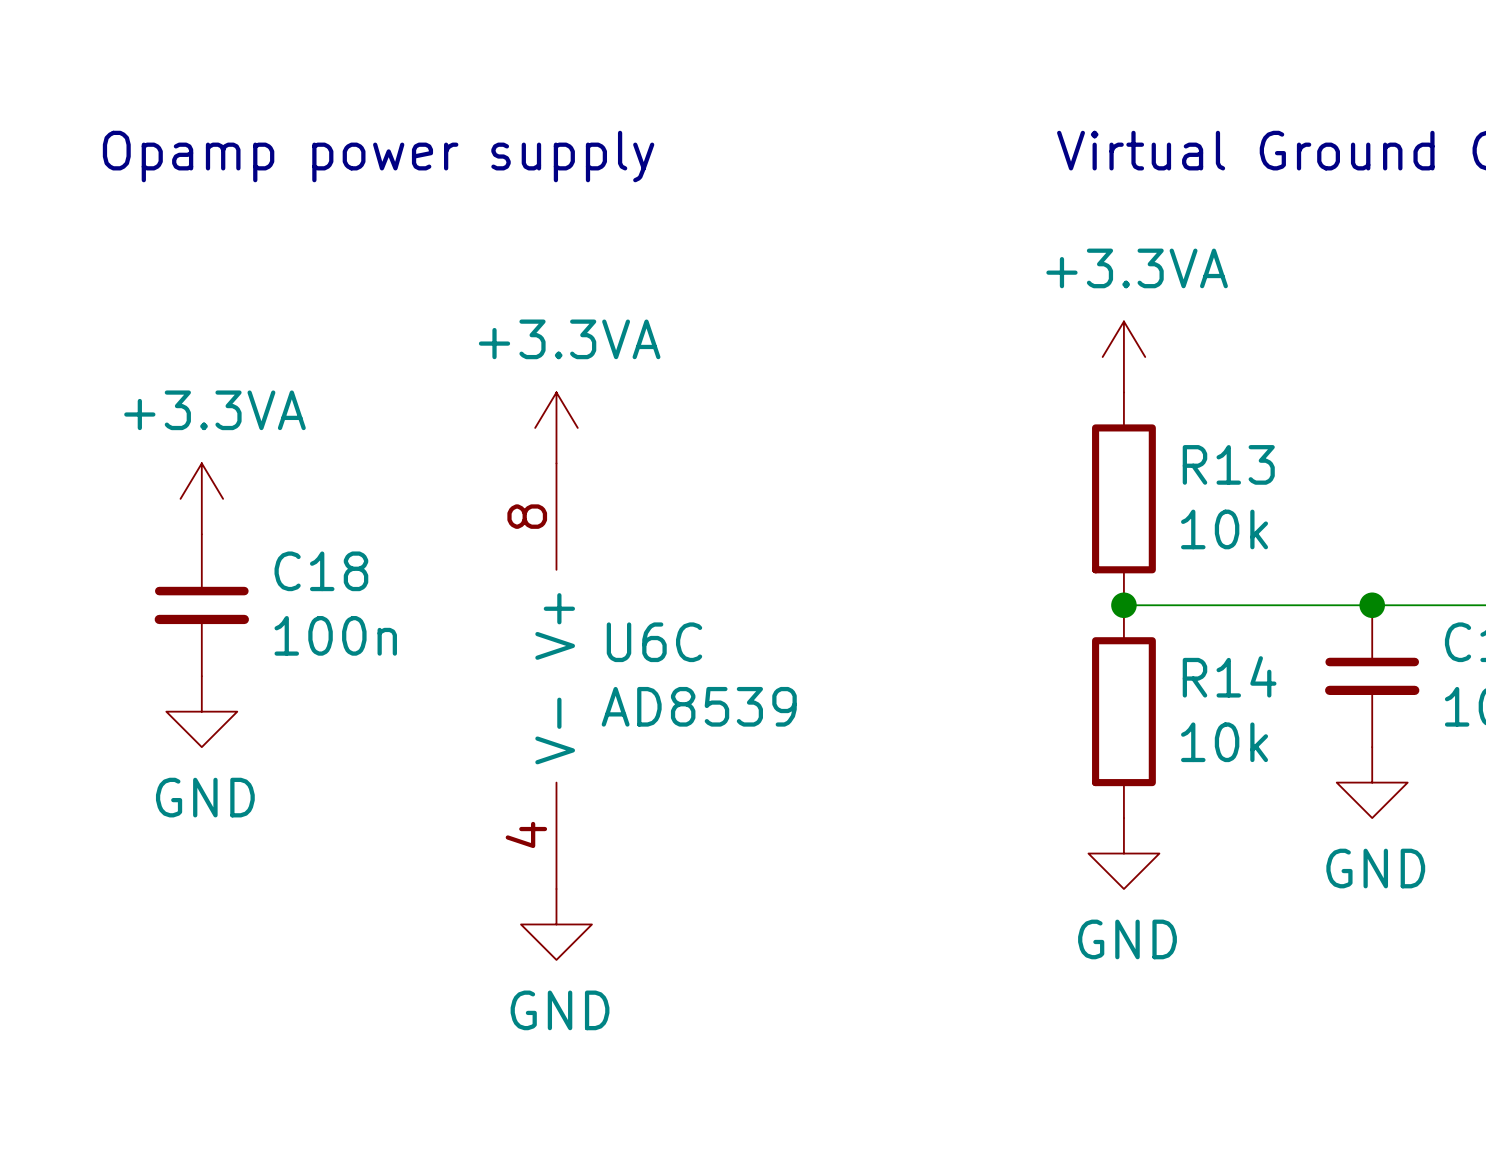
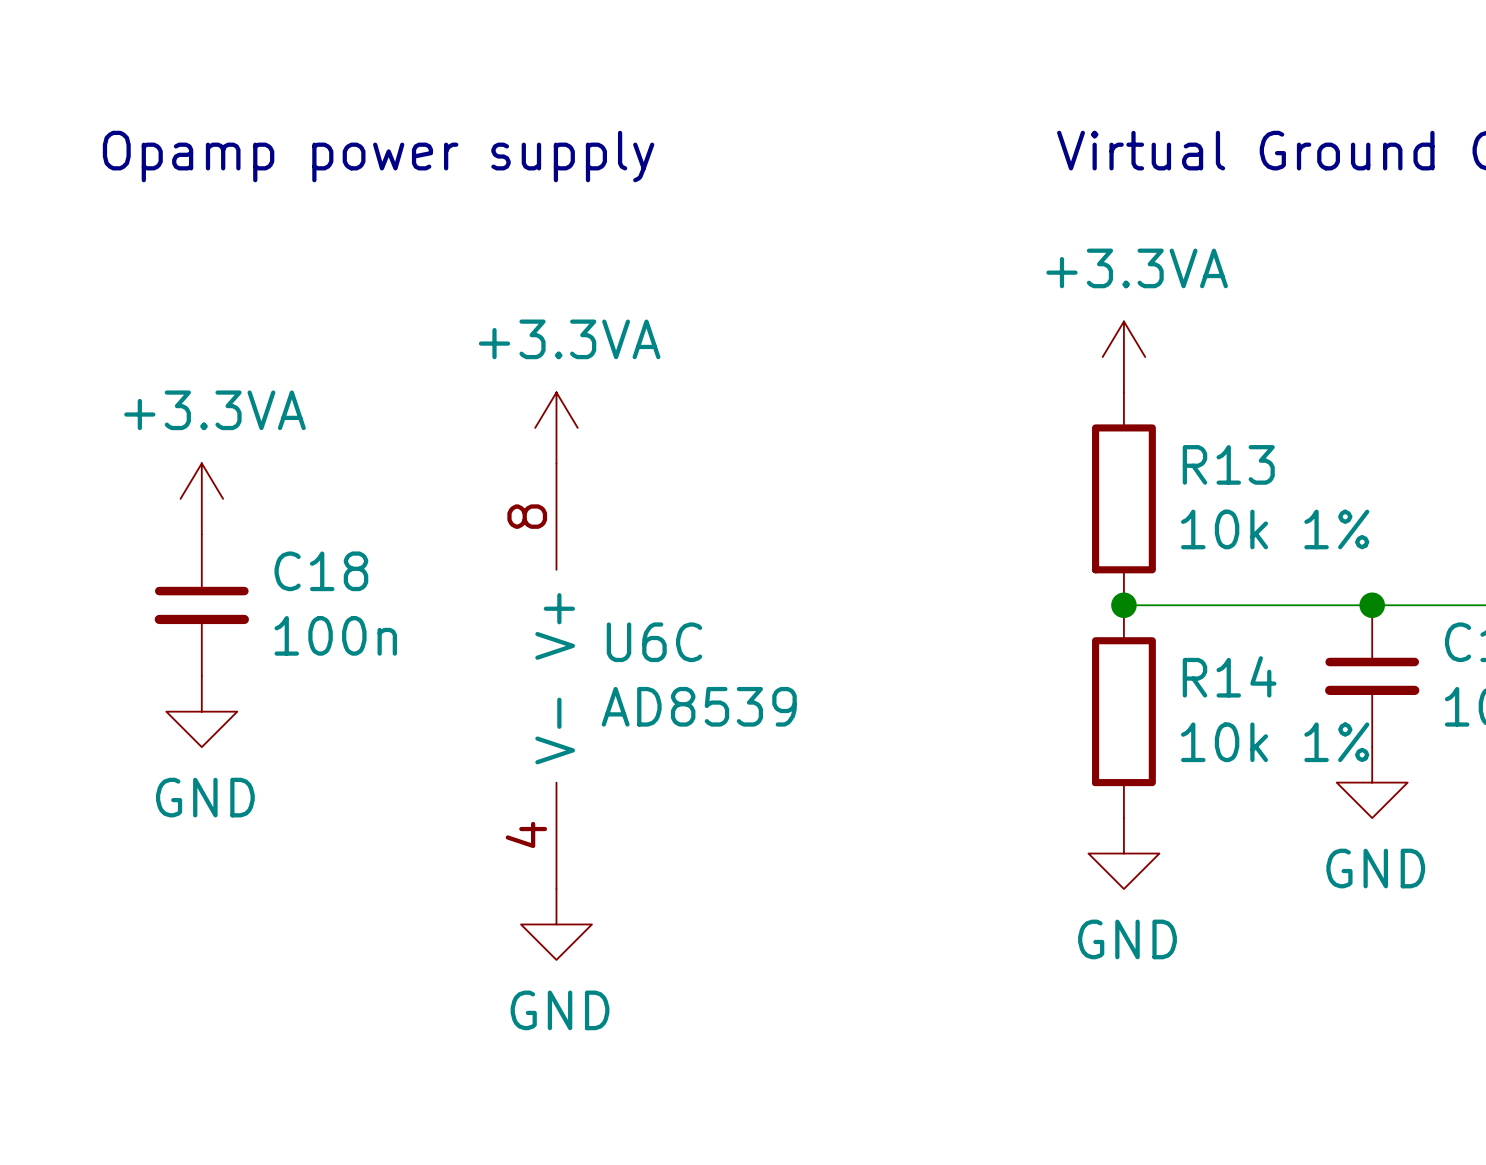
R13 value: 10k (1224, 529) -> 10k 1% (1275, 529)
R14 value: 10k (1224, 742) -> 10k 1% (1275, 742)

